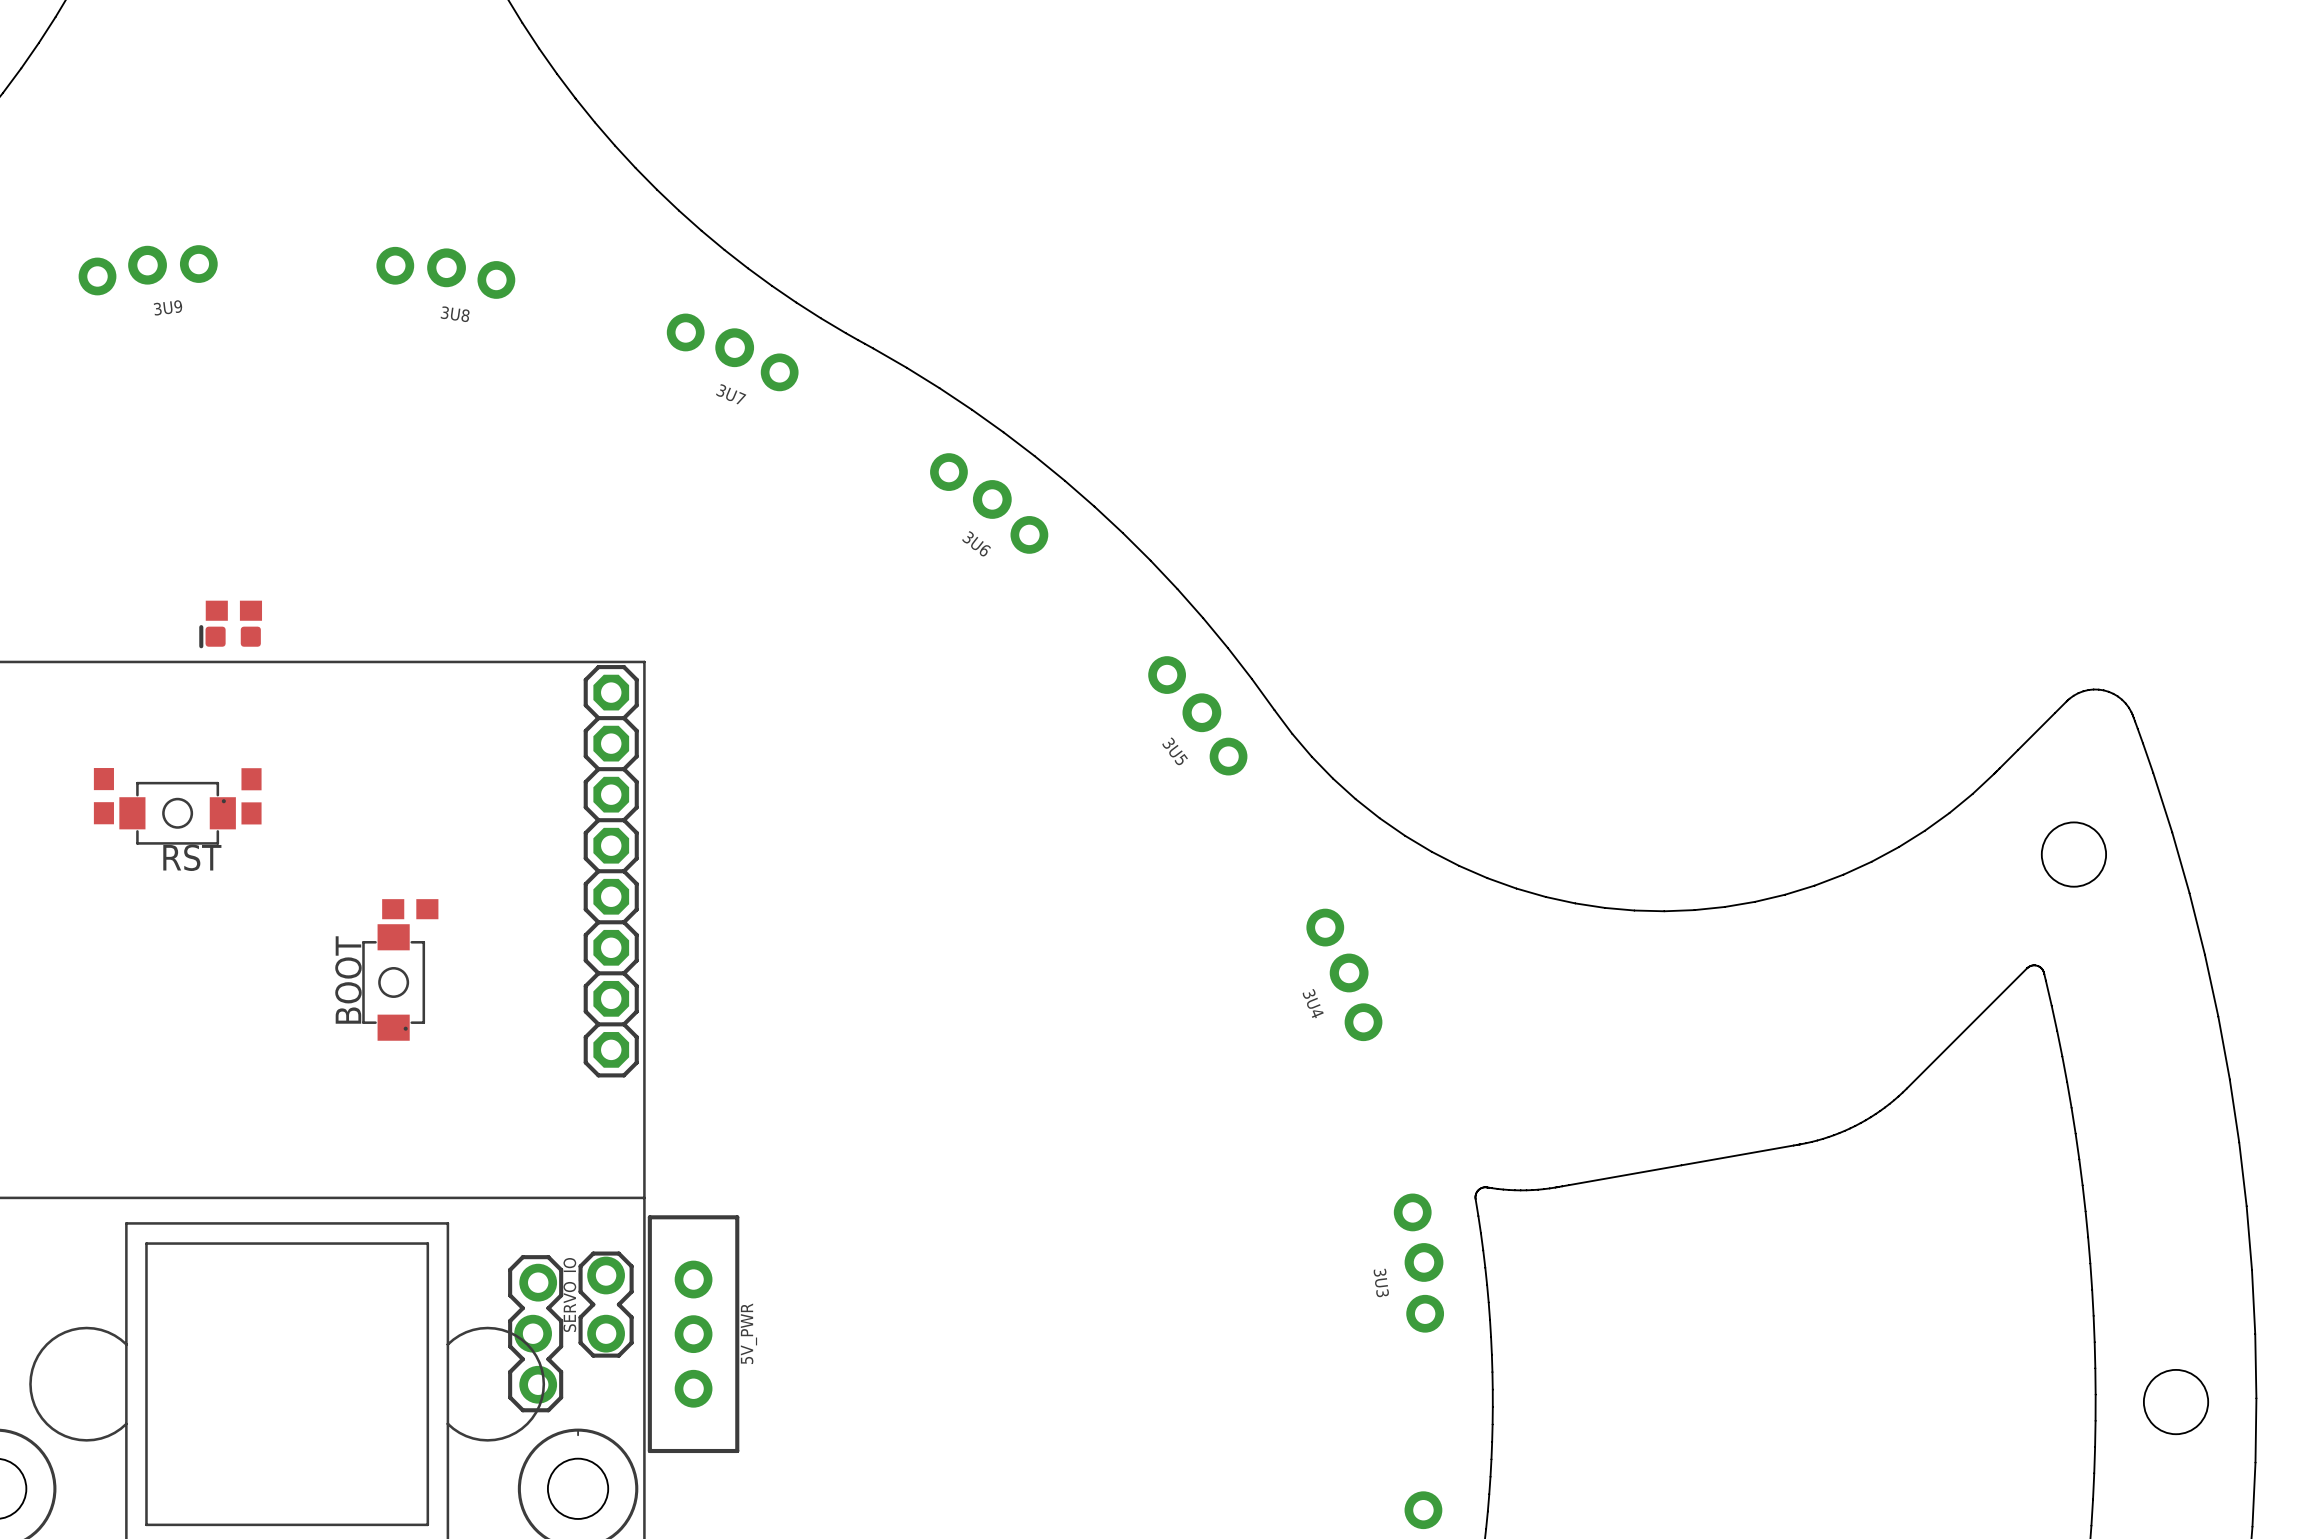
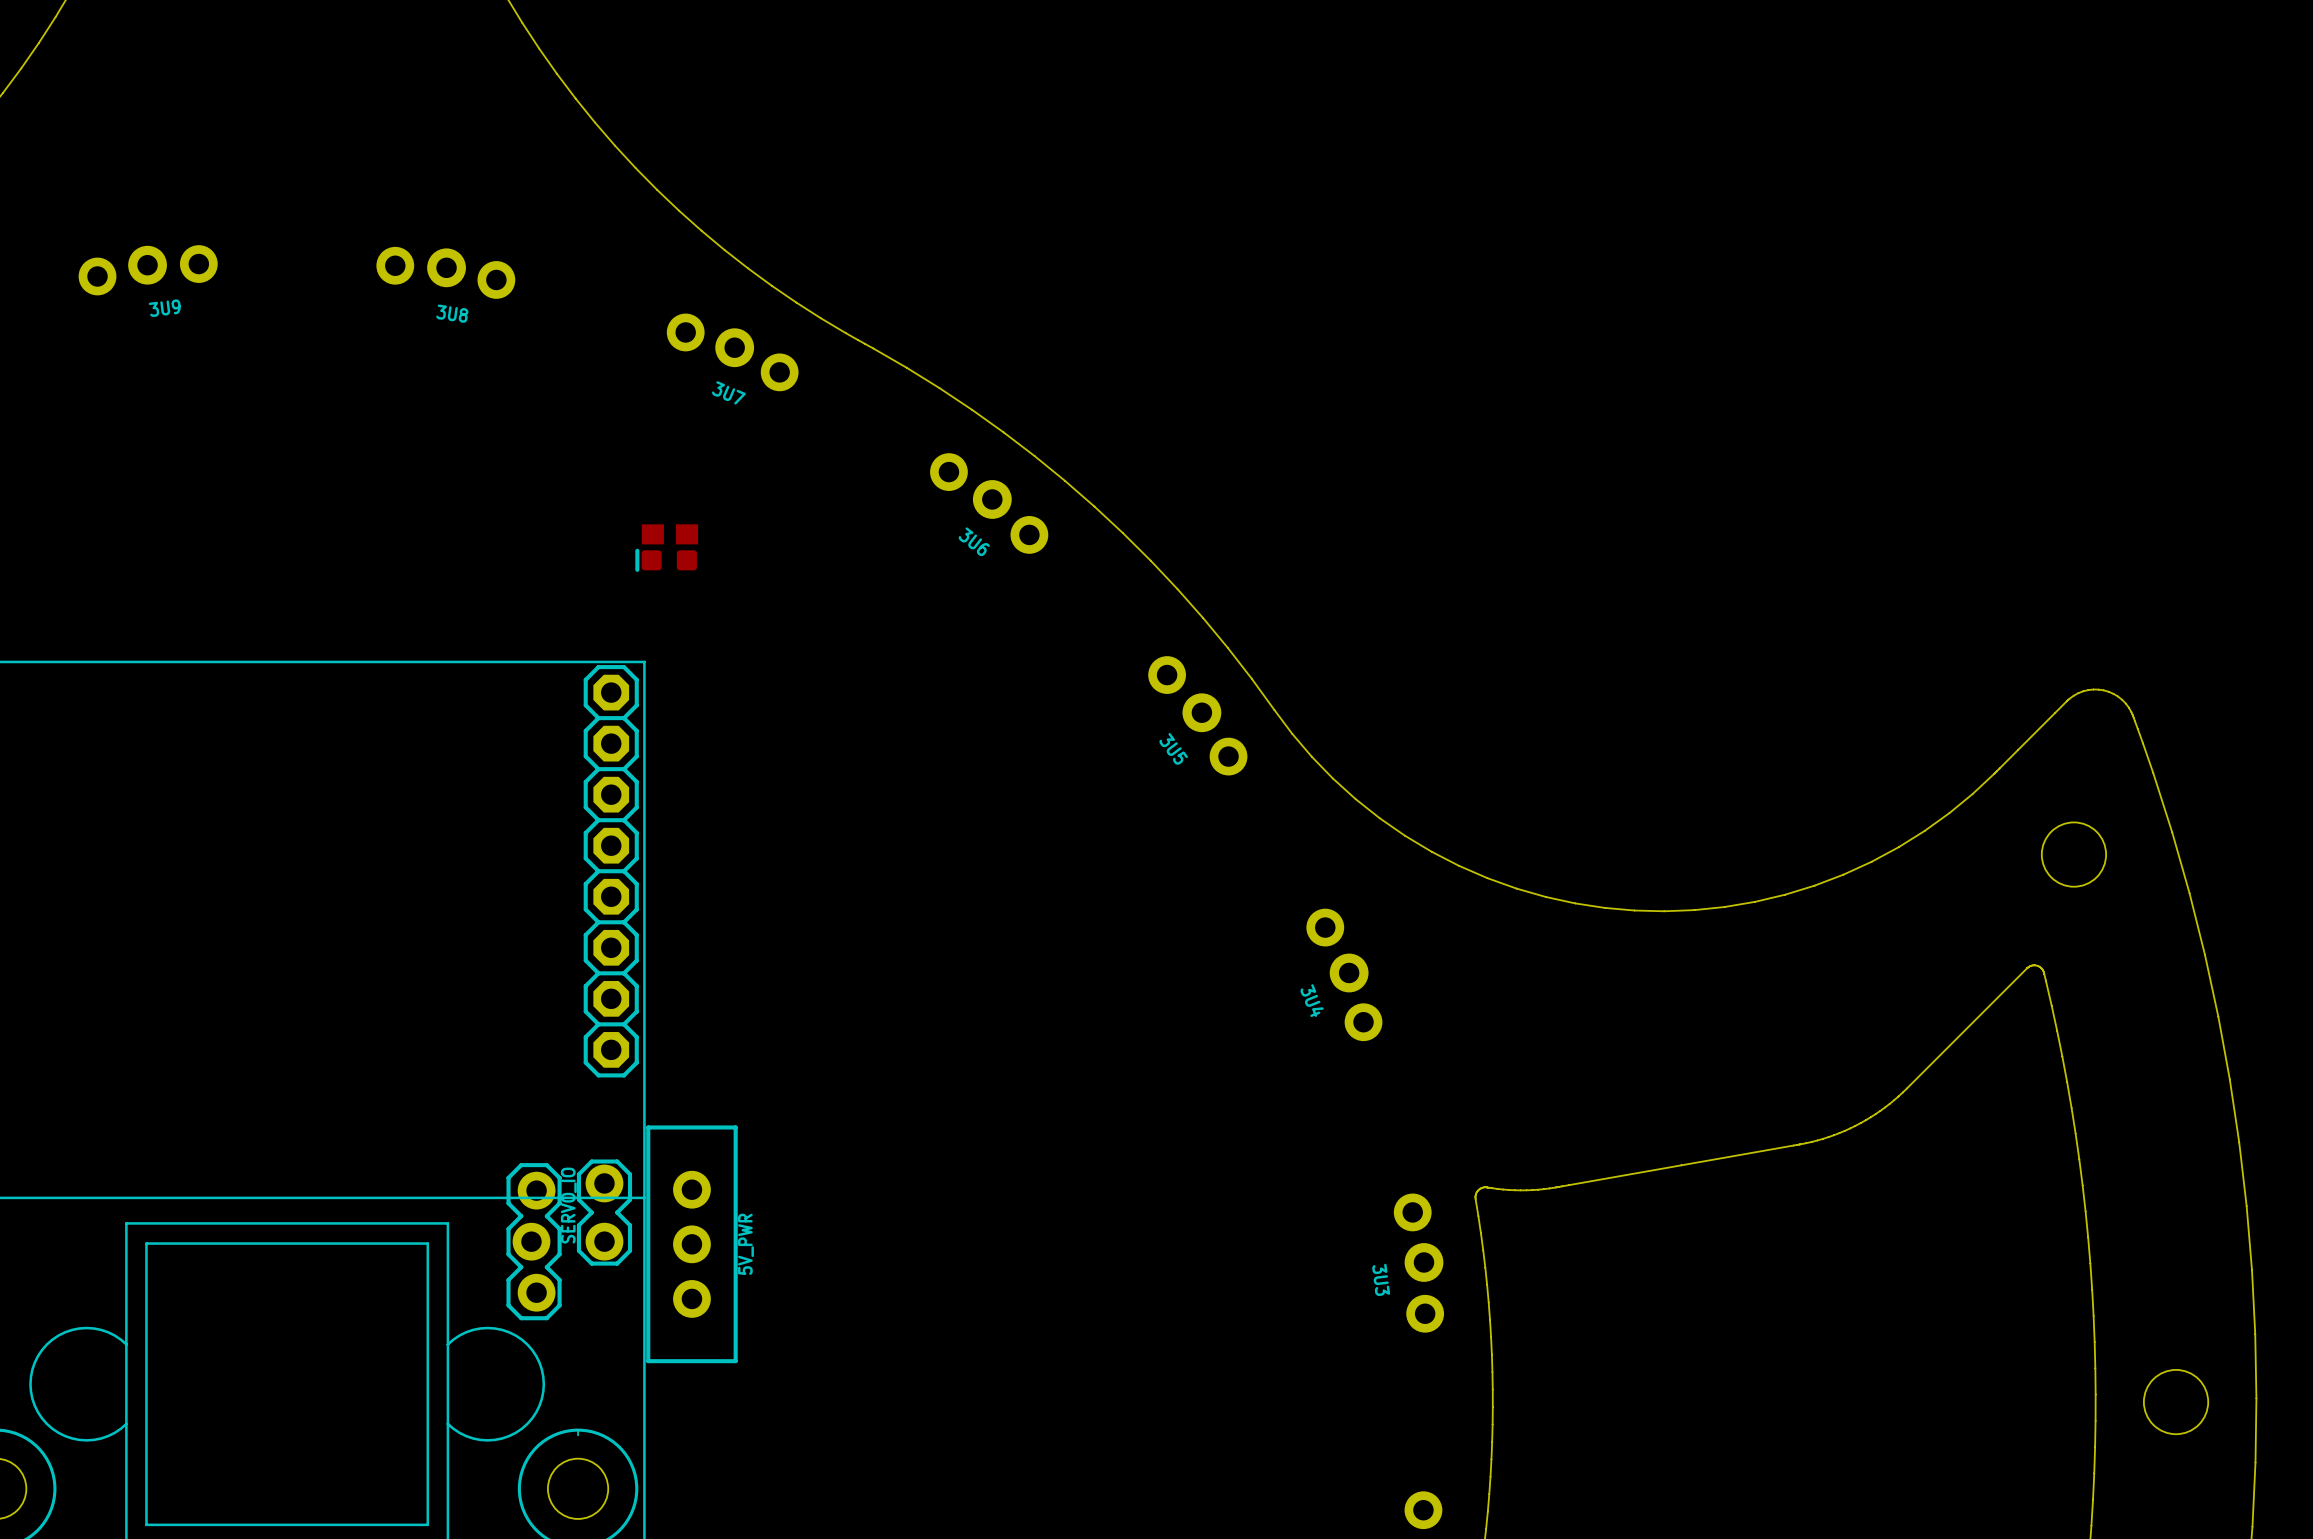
part: none -> (669, 534)
part: (233, 610) -> none
part position: (230, 636) -> (666, 560)
part: (103, 796) -> none
part: (251, 796) -> none
RST: (177, 813) -> none
part: (410, 909) -> none
BOOT: (393, 982) -> none
part position: (606, 1304) -> (604, 1212)
SERVO_IO position: (535, 1333) -> (534, 1241)
5V_PWR position: (693, 1334) -> (691, 1244)

